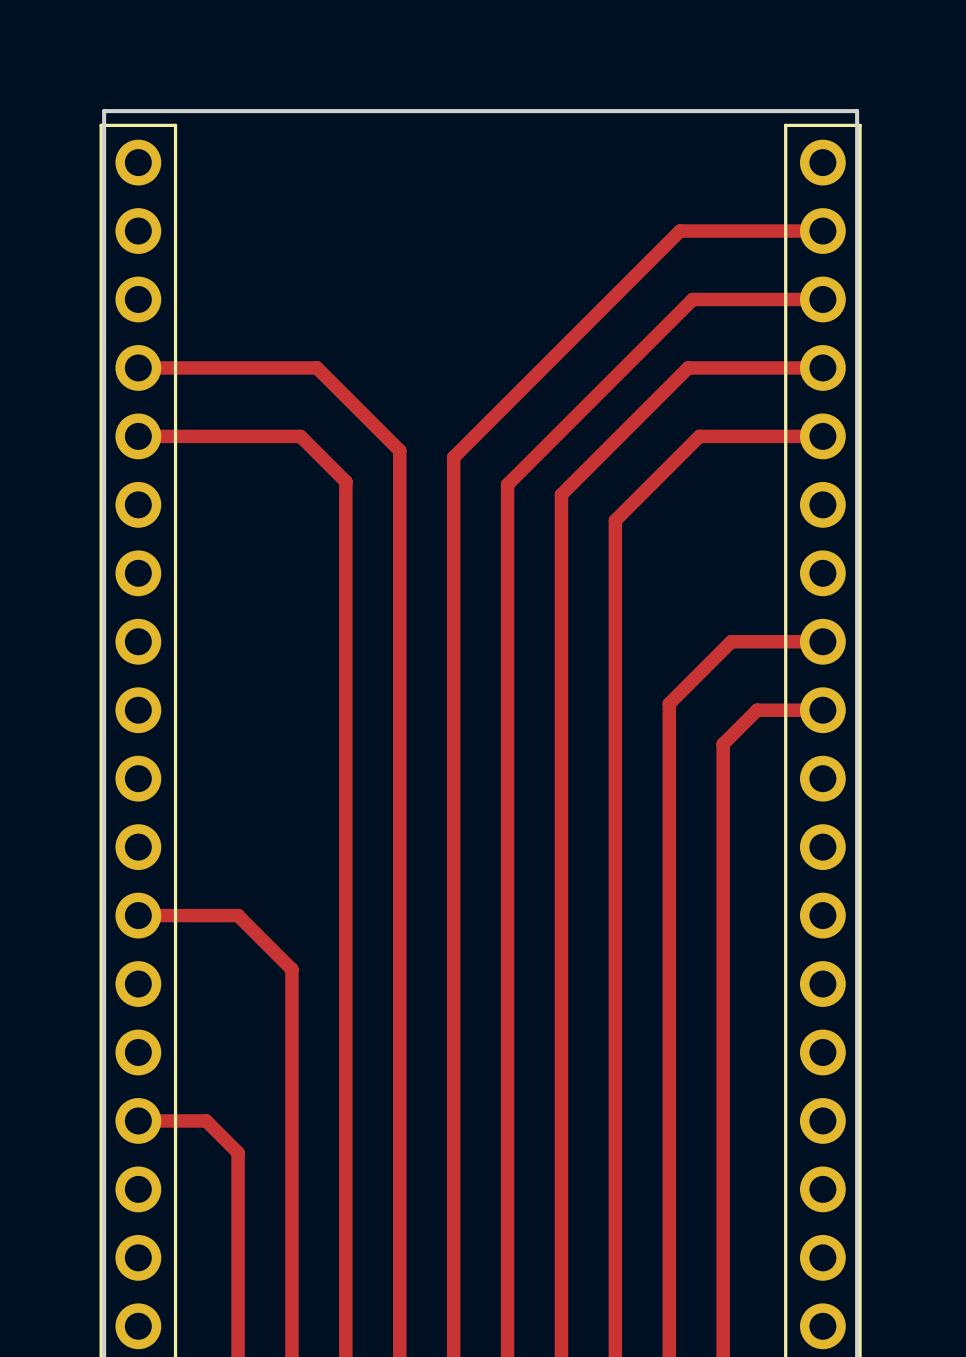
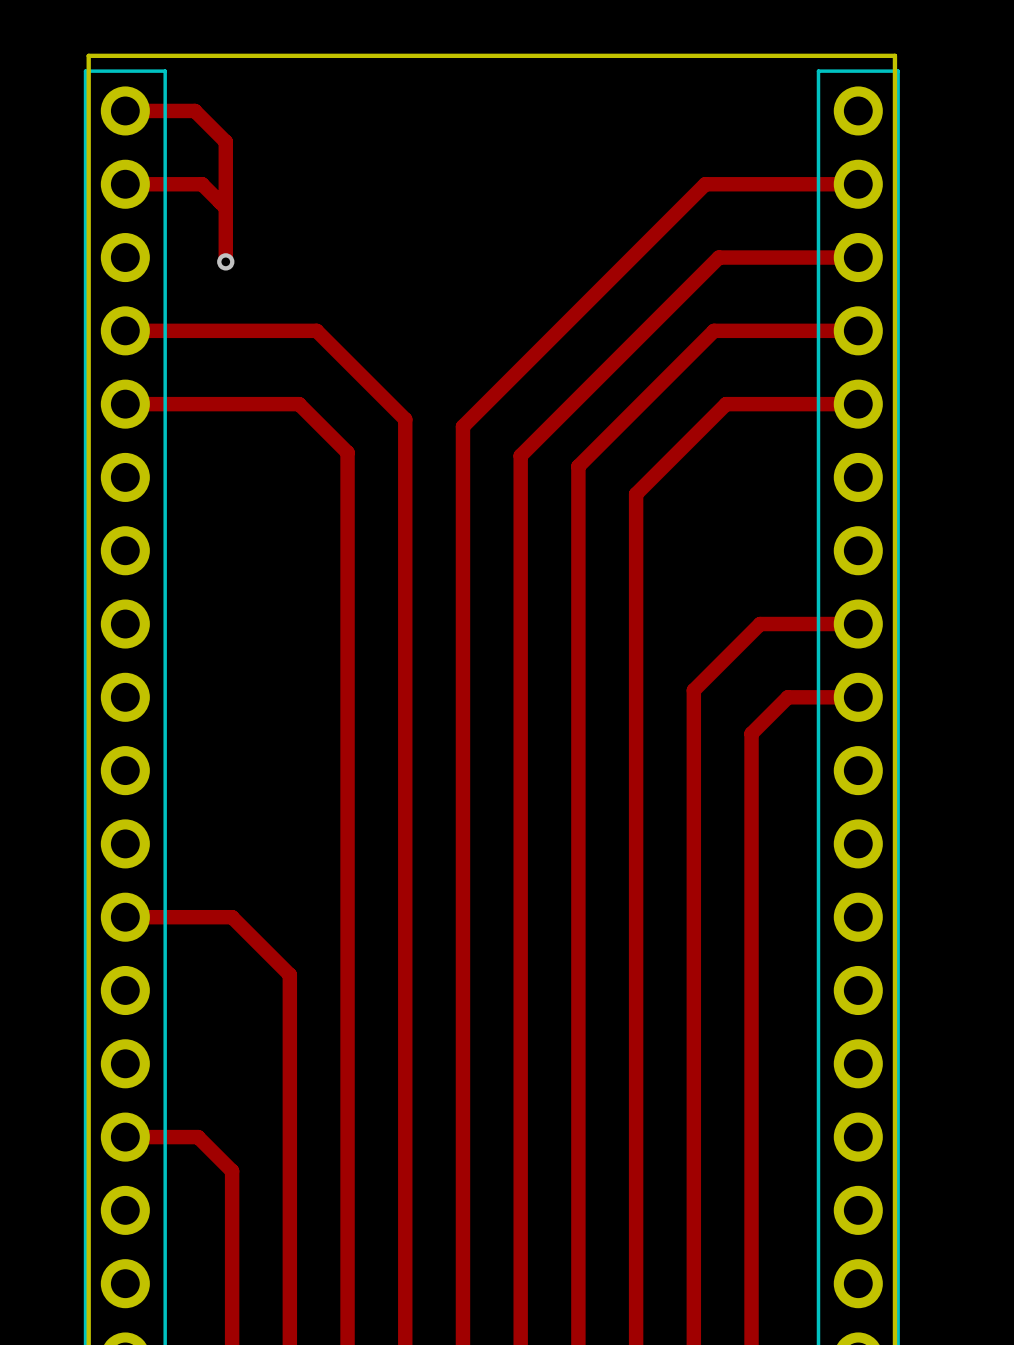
track: none -> (125, 110) (194, 110) (225, 141) (225, 261)
track: none -> (125, 184) (202, 184) (225, 207)
via: none -> (225, 261)

